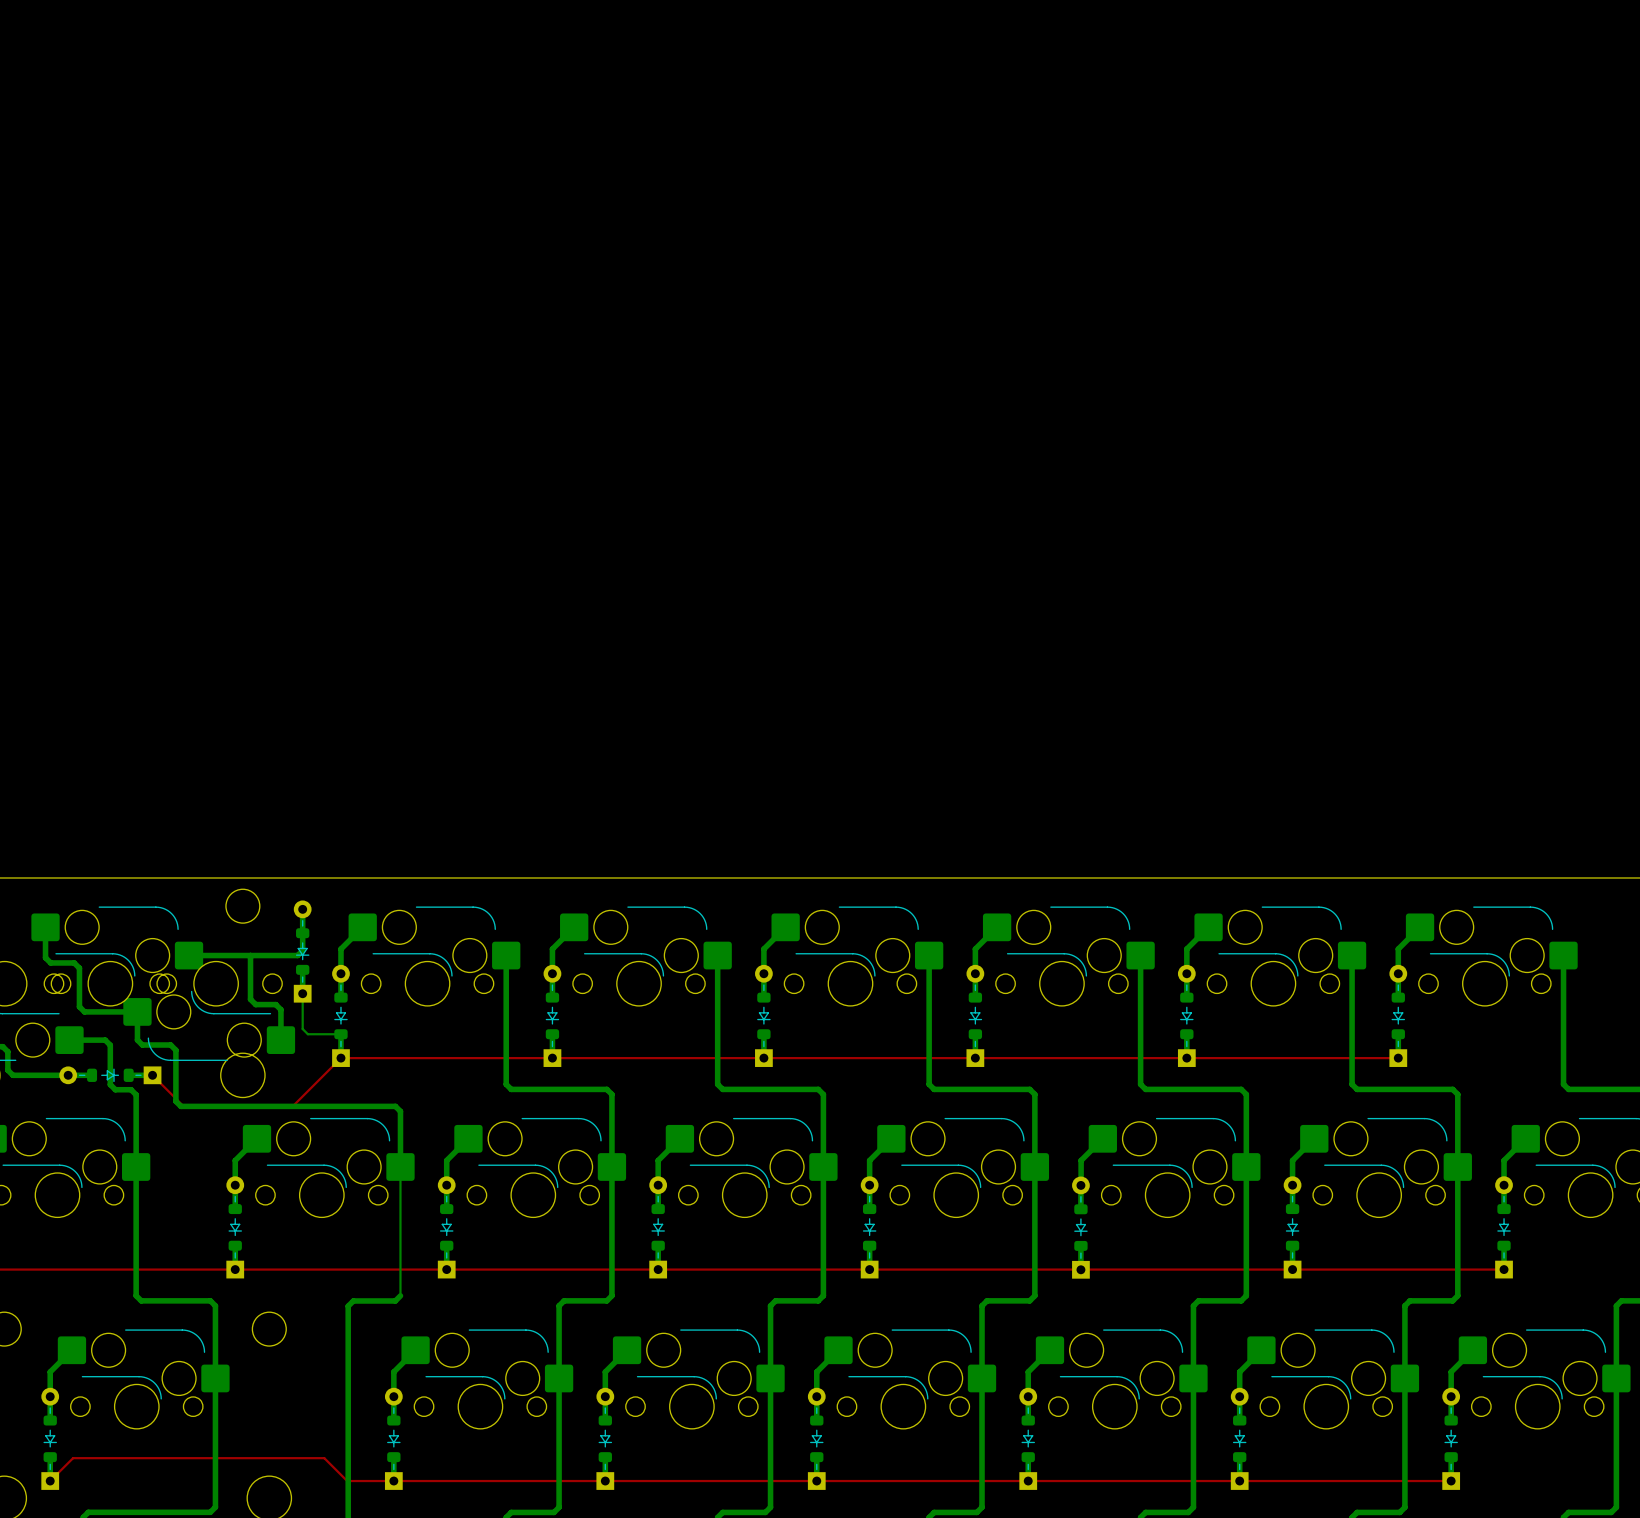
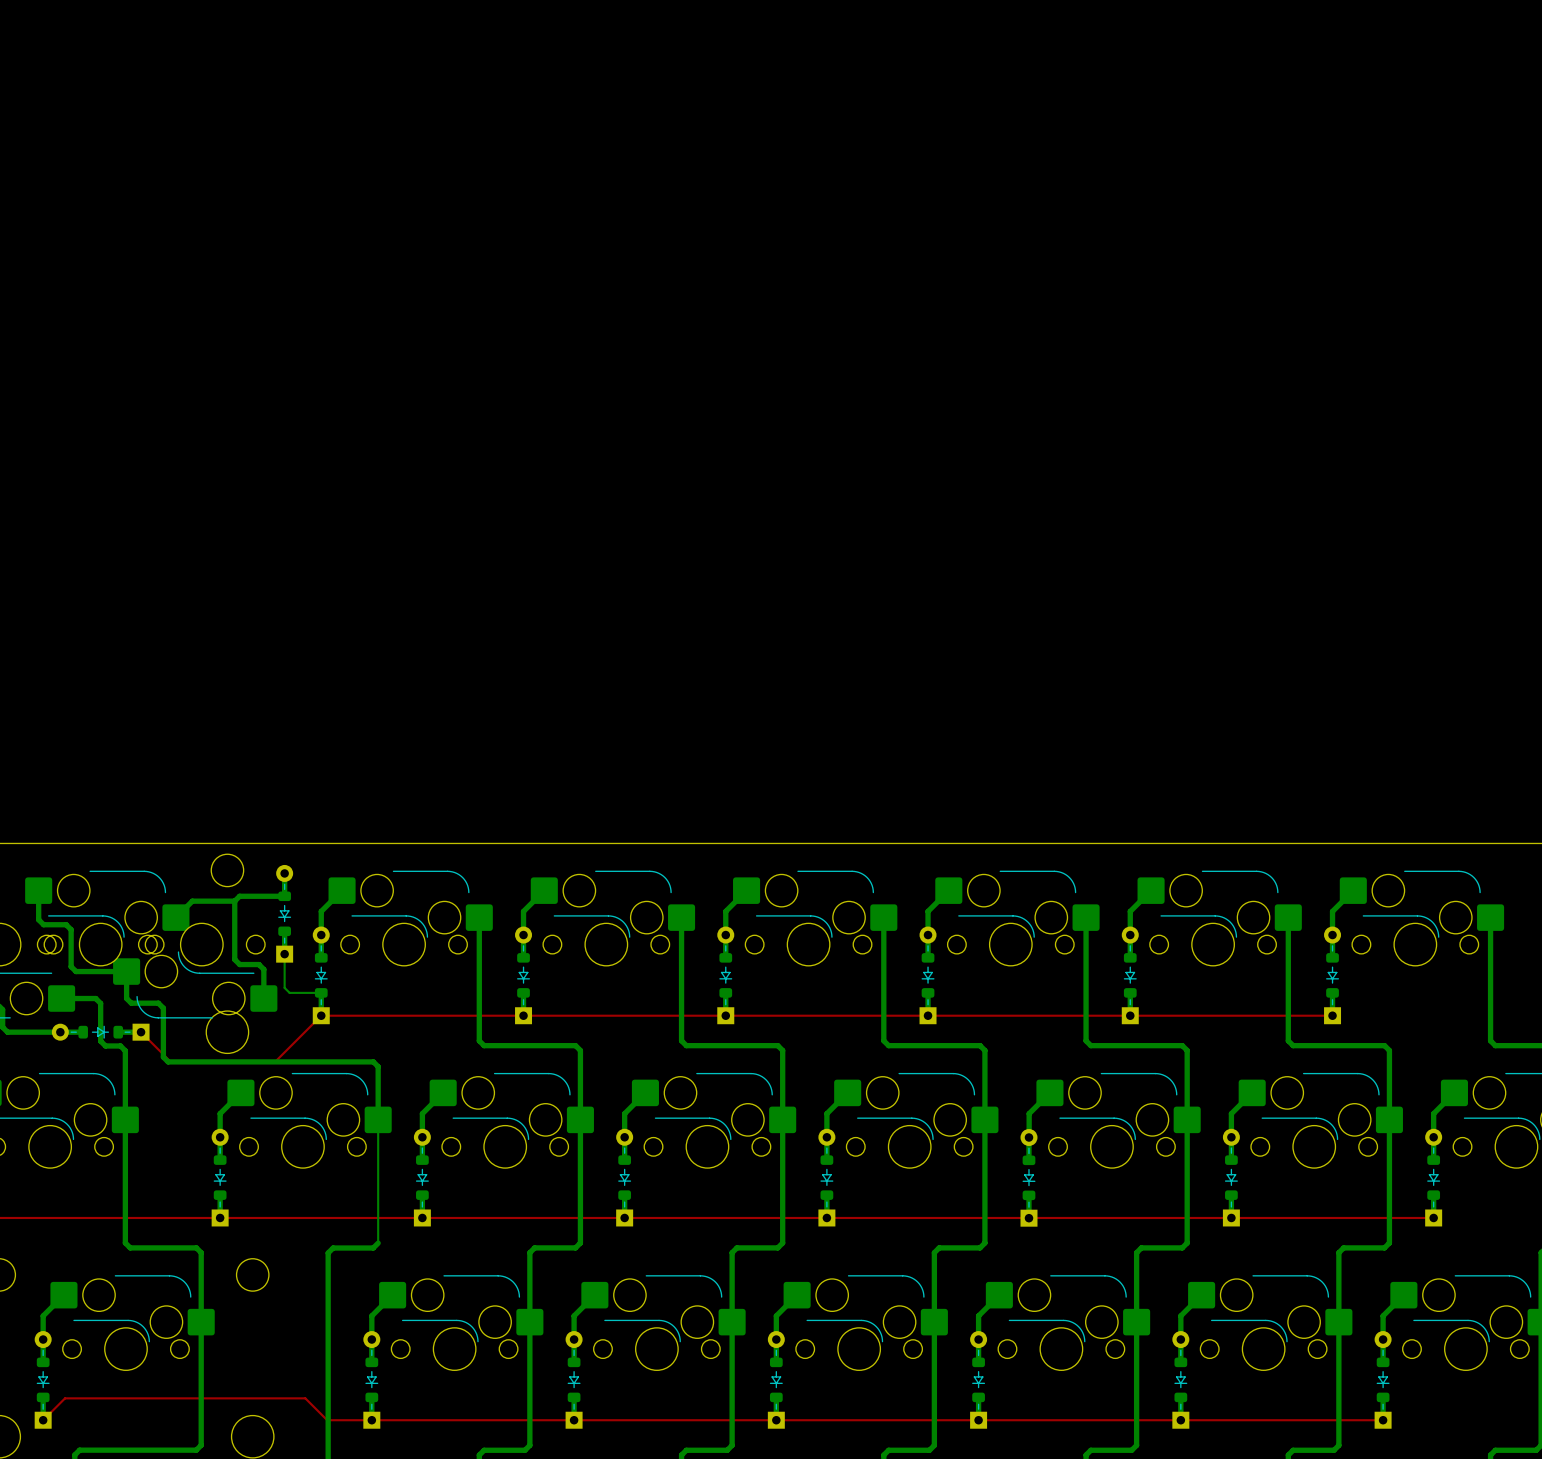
bottom track: (302, 933) (302, 950) (297, 955) (189, 955) -> (234, 901) (192, 901) (175, 917)
bottom track: none -> (284, 896) (239, 896) (234, 901)
bottom track: none -> (234, 901) (234, 917)

